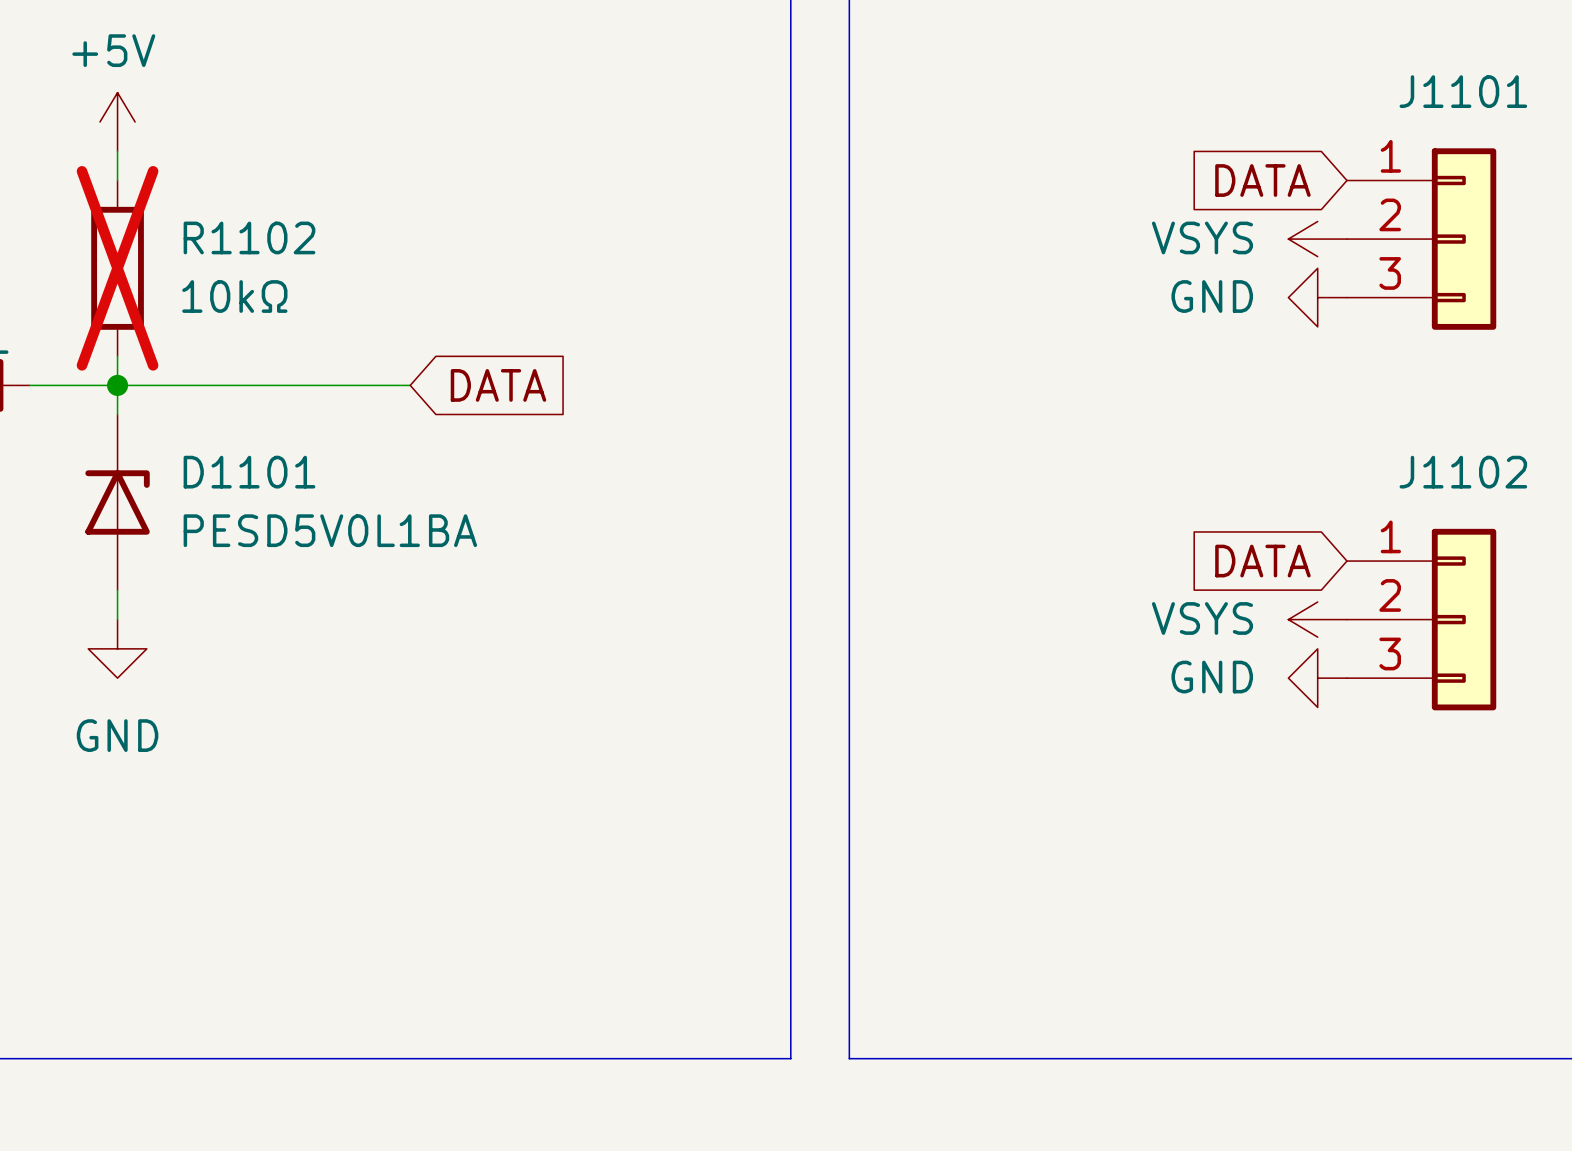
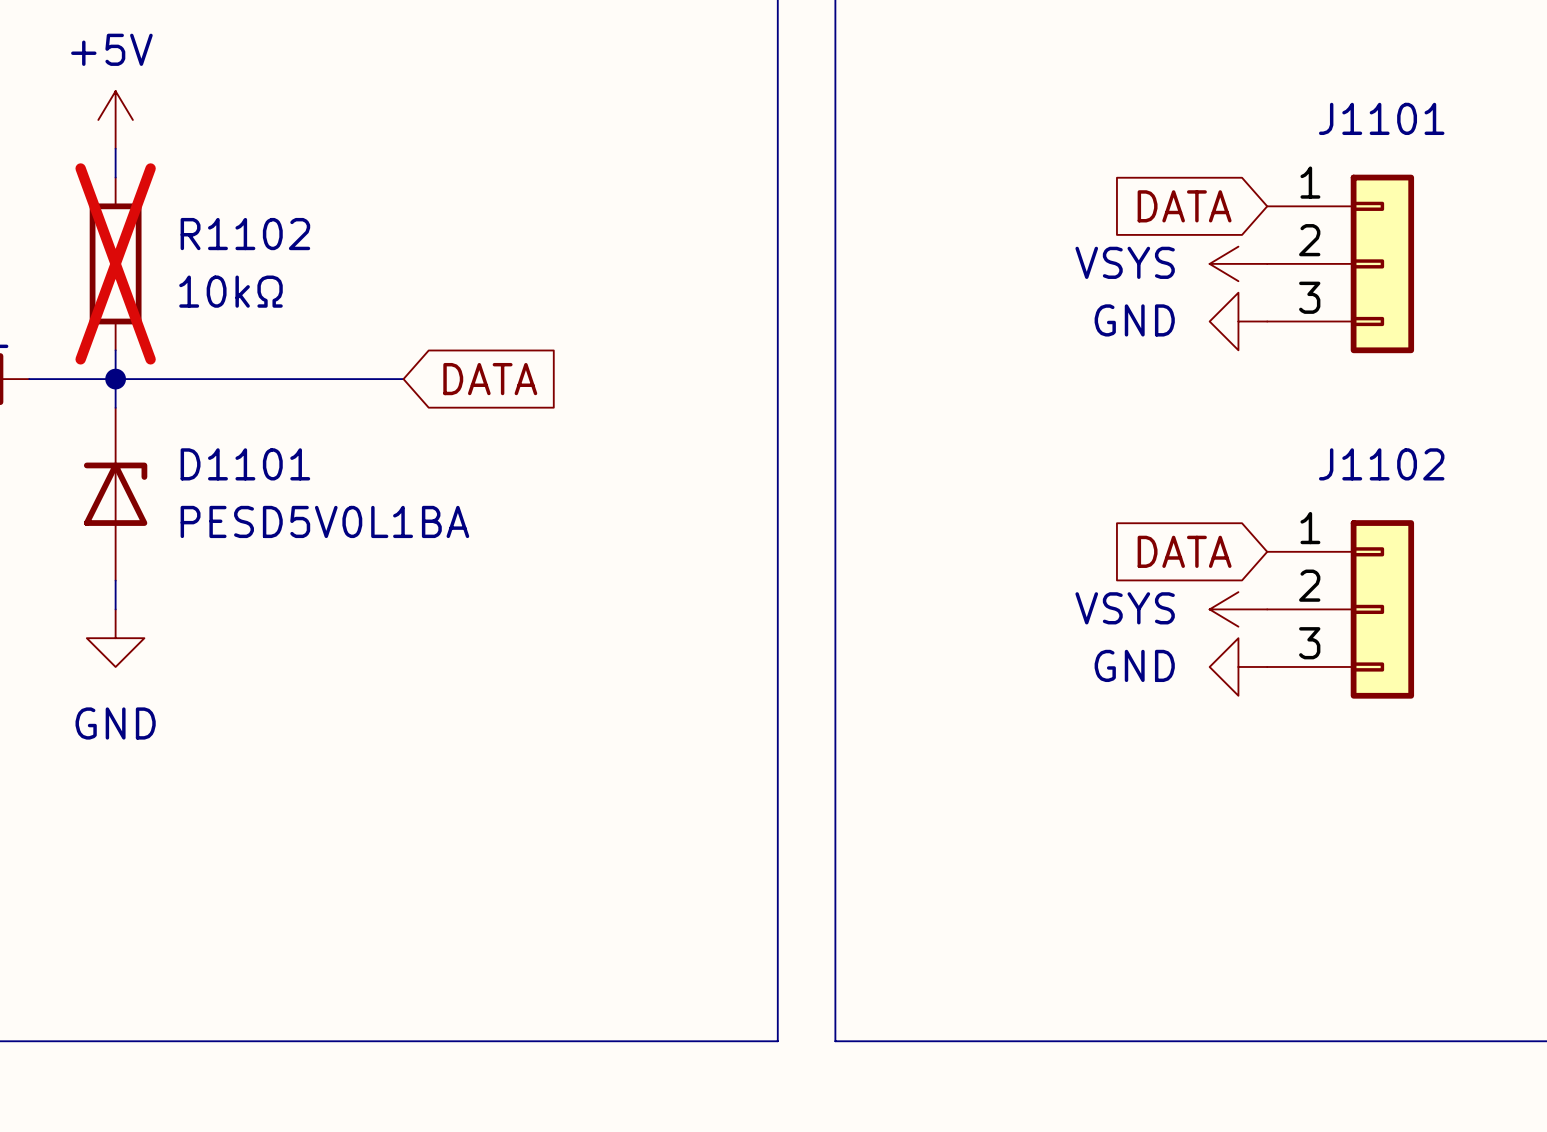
global label position: DATA (1262, 180) -> DATA (1184, 206)
power symbol position: VSYS (1317, 239) -> VSYS (1238, 263)
J1101 position: (1421, 239) -> (1340, 263)
power symbol position: GND (1317, 297) -> GND (1238, 321)
global label position: DATA (1262, 561) -> DATA (1184, 551)
power symbol position: VSYS (1317, 619) -> VSYS (1238, 609)
J1102 position: (1421, 619) -> (1340, 609)
power symbol position: GND (1317, 678) -> GND (1238, 666)

